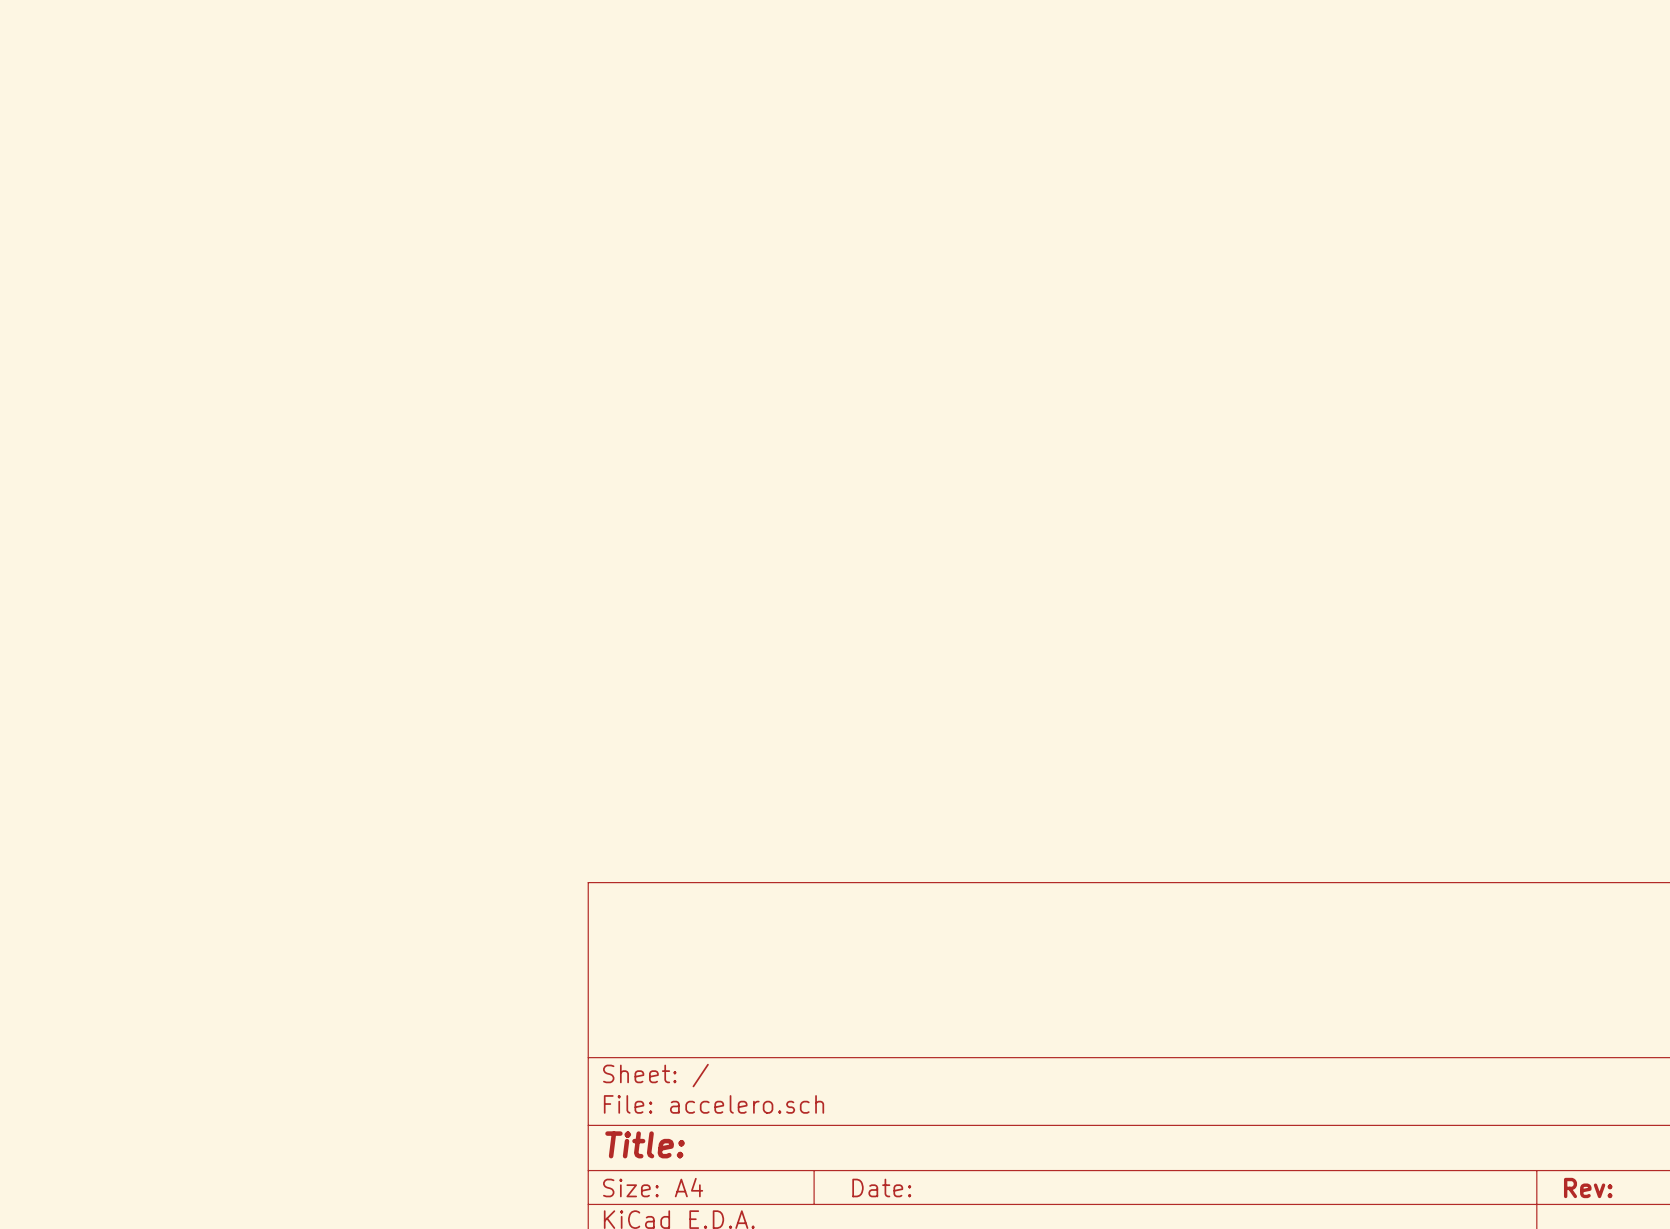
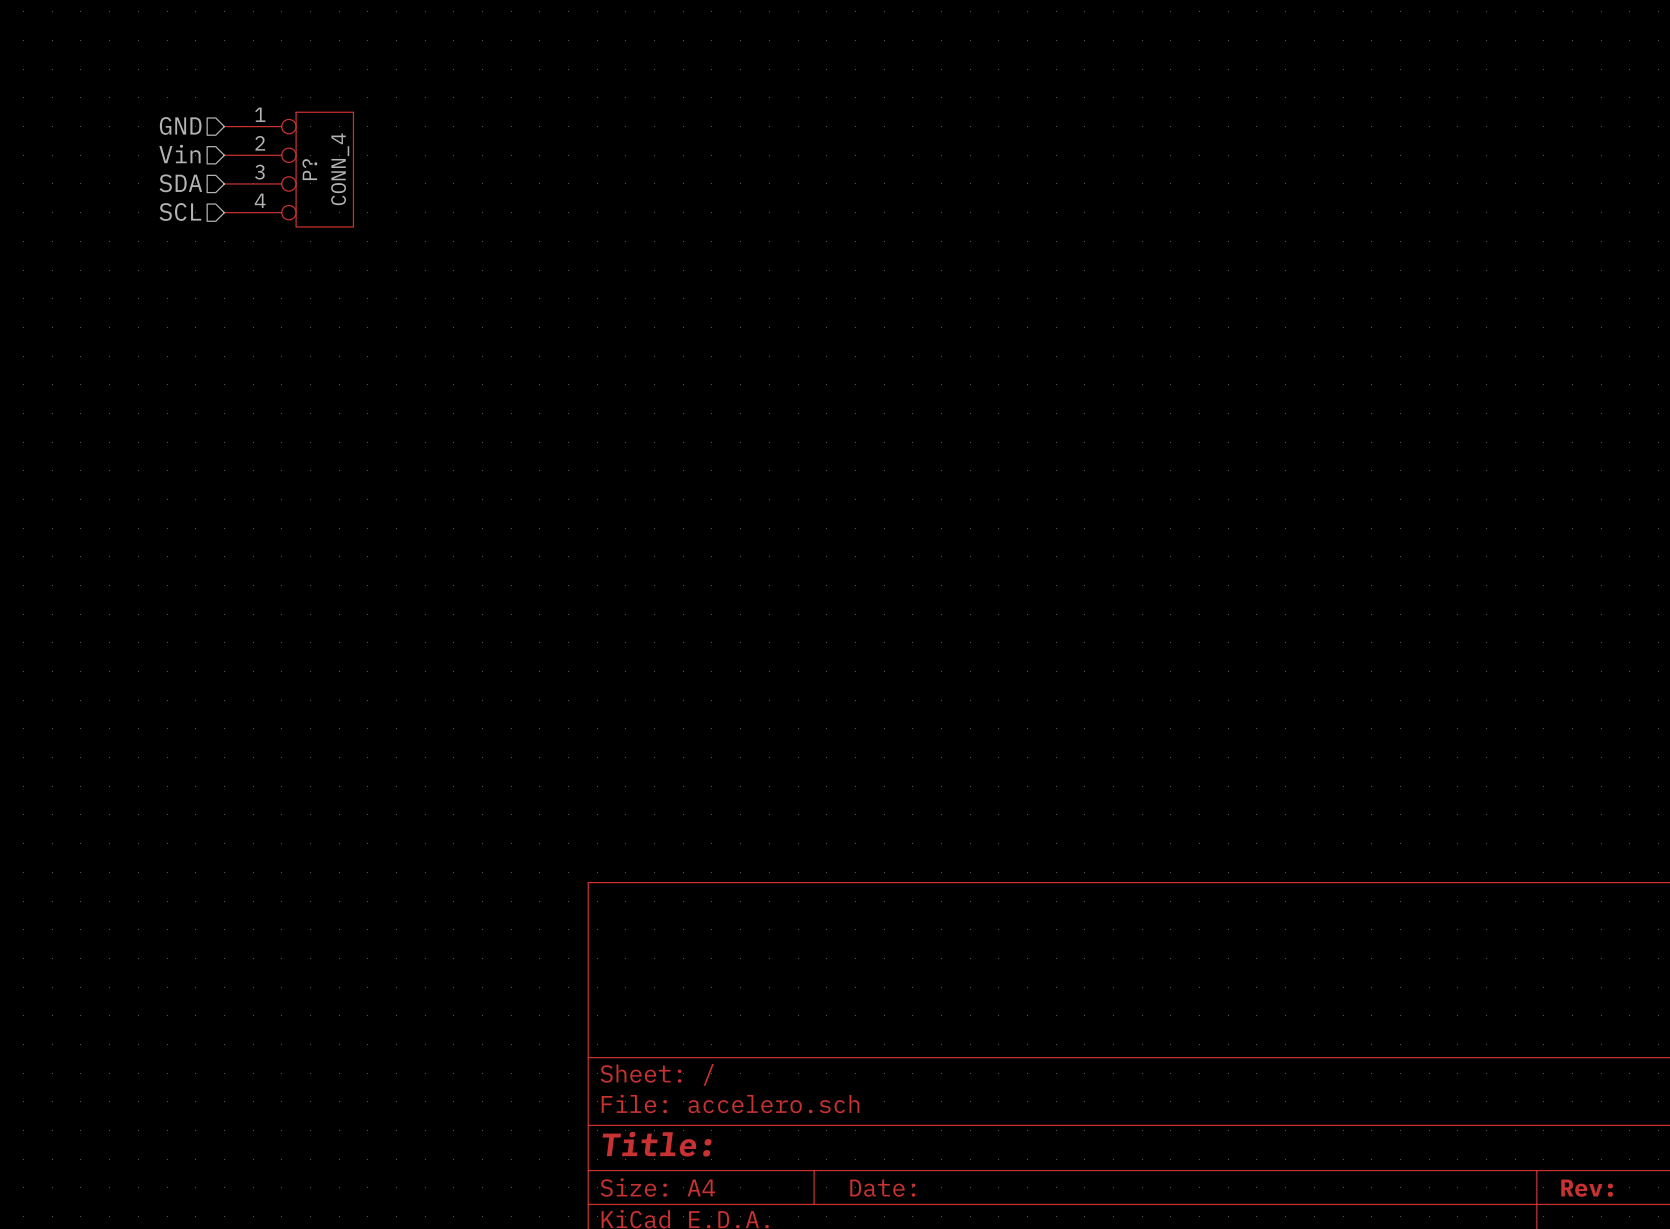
hierarchical label: none -> GND (180, 125)
hierarchical label: none -> Vin (179, 154)
P?: none -> CONN_4 (288, 169)
hierarchical label: none -> SDA (180, 183)
hierarchical label: none -> SCL (180, 212)

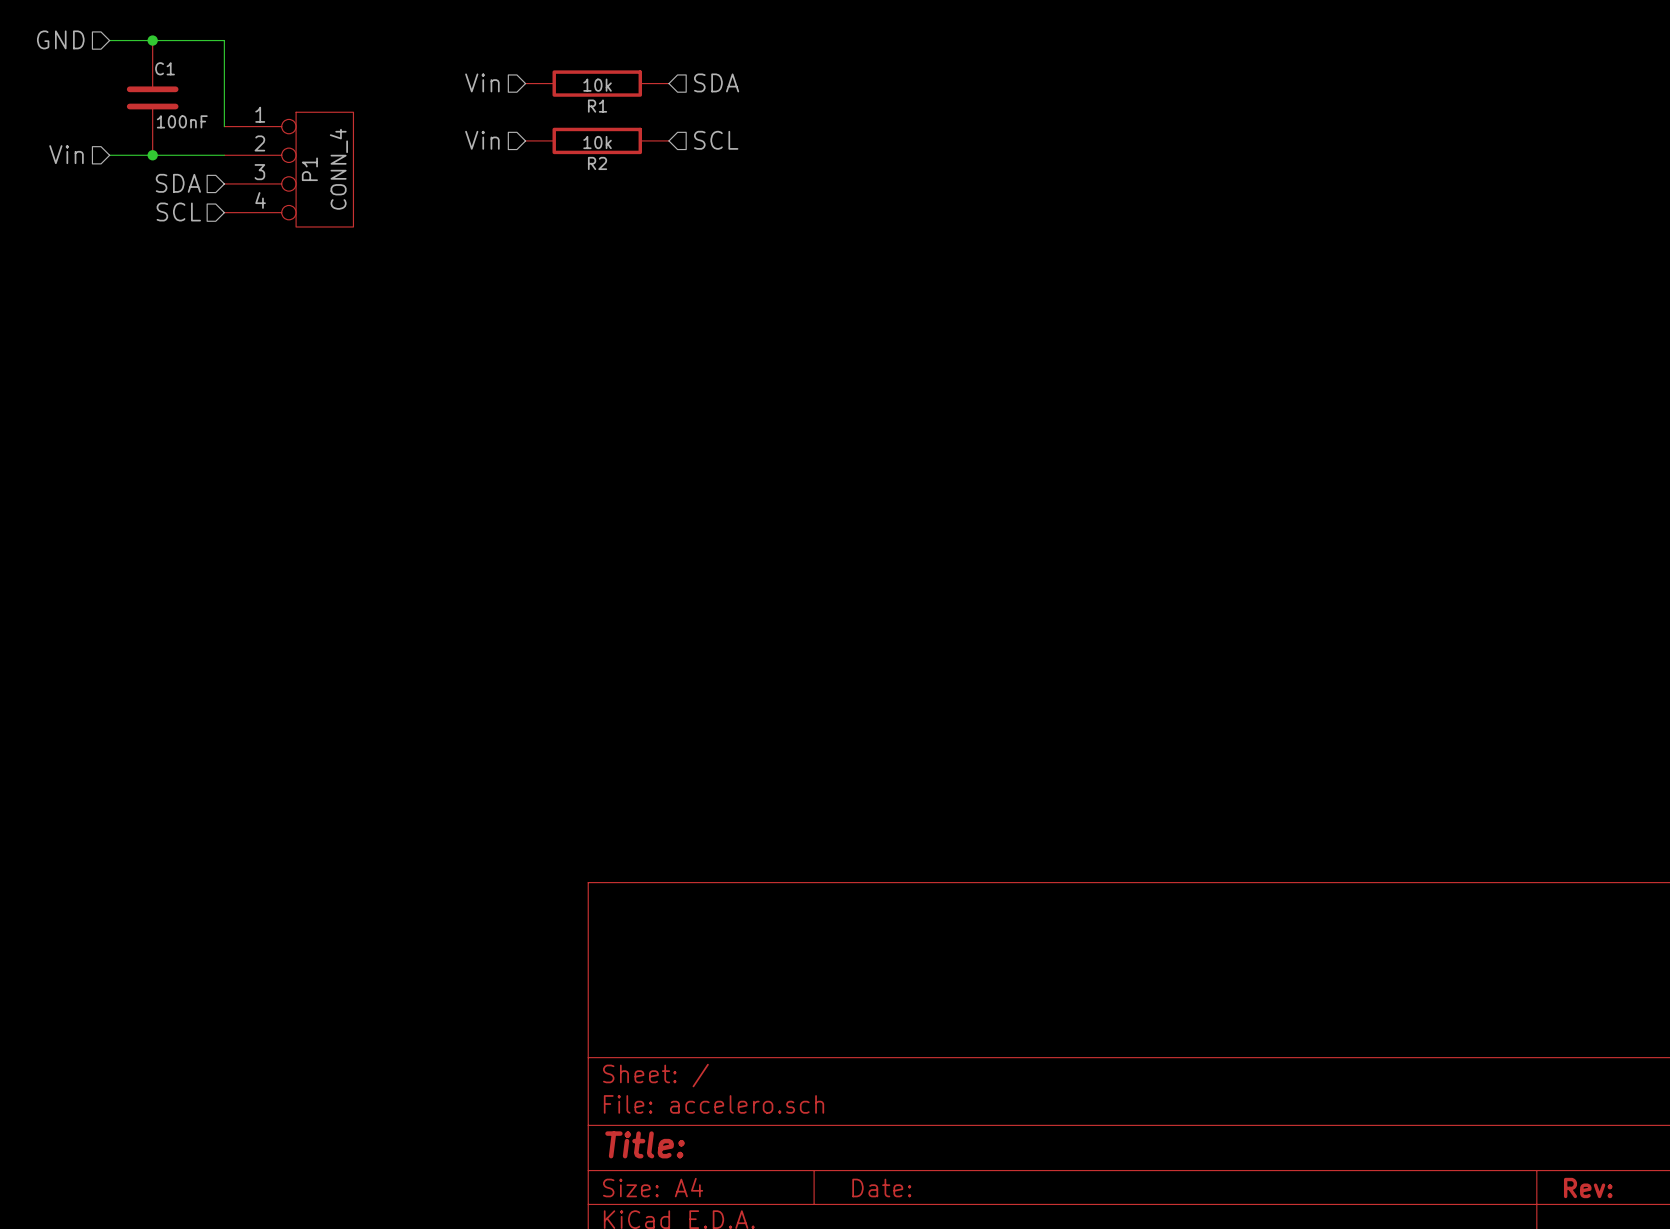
wire: none -> (109, 40) (224, 40) (224, 126)
junction: none -> (152, 40)
hierarchical label: none -> Vin (482, 82)
hierarchical label: none -> SDA (716, 82)
R1: none -> 10k (597, 83)
C1: none -> 100nF (152, 97)
hierarchical label position: GND (180, 125) -> GND (60, 39)
hierarchical label: none -> Vin (482, 140)
R2: none -> 10k (597, 140)
hierarchical label: none -> SCL (716, 140)
hierarchical label position: Vin (179, 154) -> Vin (66, 154)
wire: none -> (109, 155) (224, 155)
junction: none -> (152, 155)
P? name: P? (309, 169) -> P1 (309, 169)

